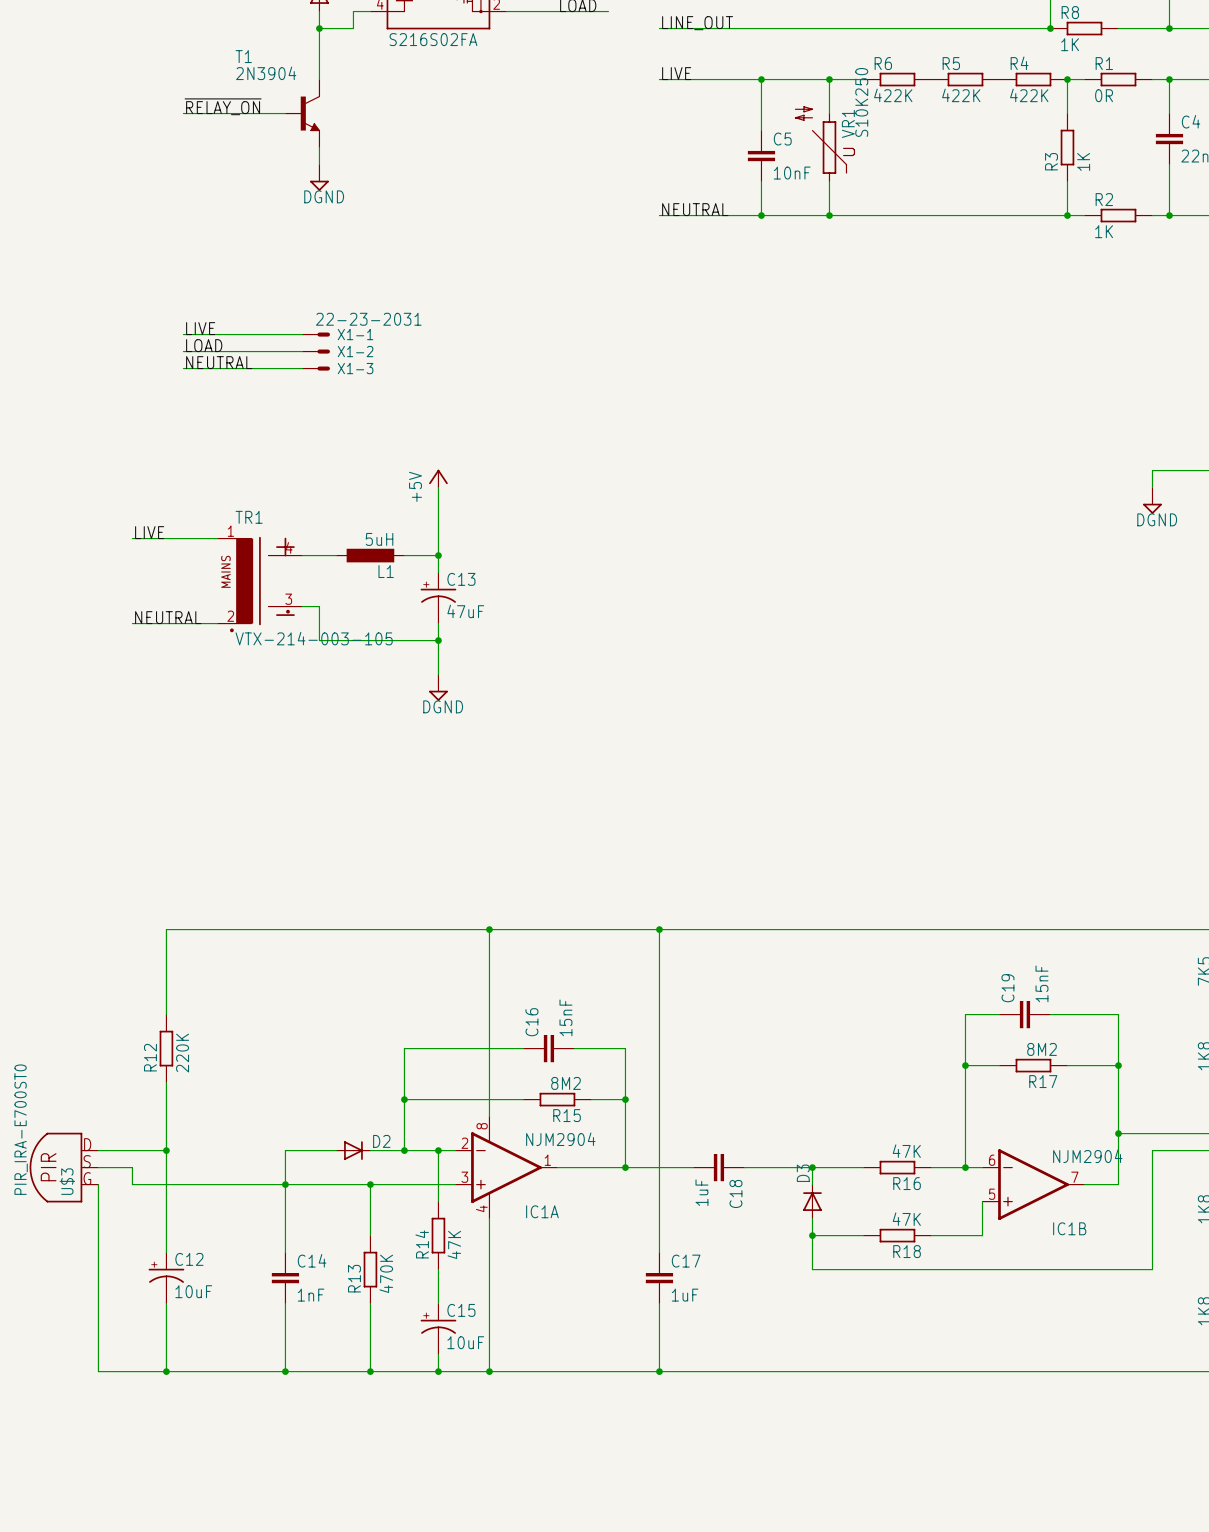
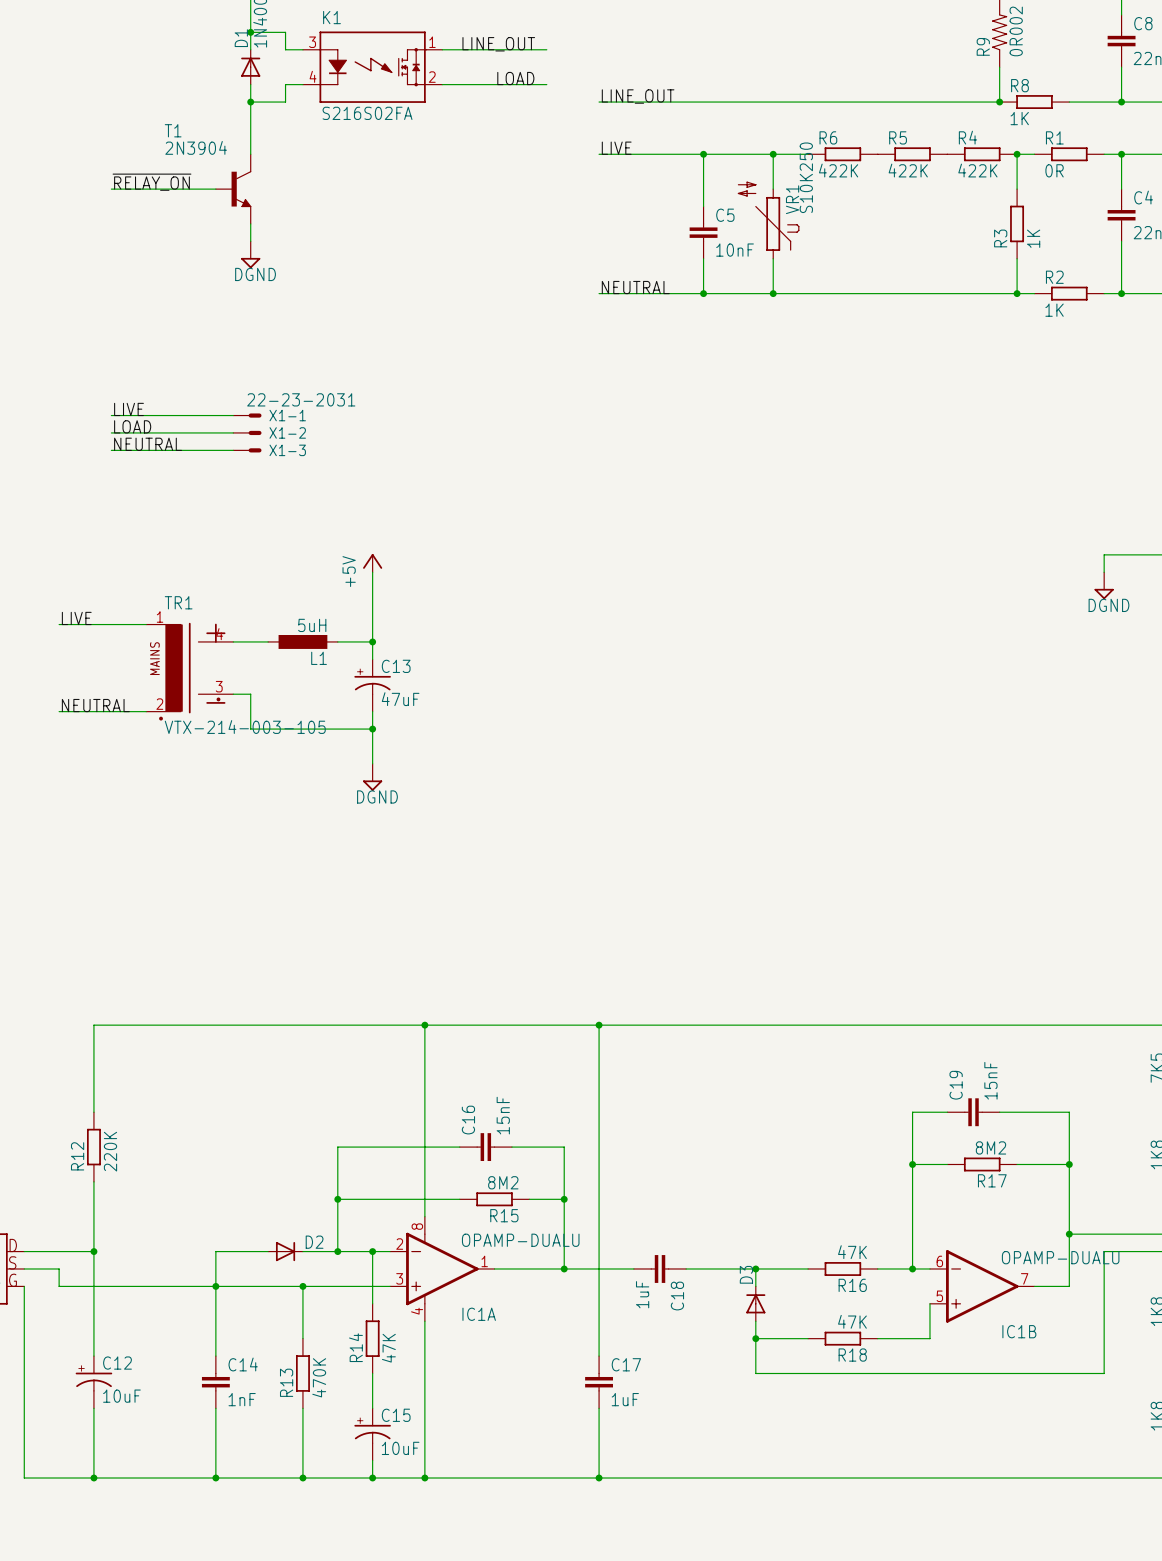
IC1A value: NJM2904 (560, 1139) -> OPAMP-DUALU (520, 1240)
IC1B value: NJM2904 (1087, 1156) -> OPAMP-DUALU (1060, 1257)

